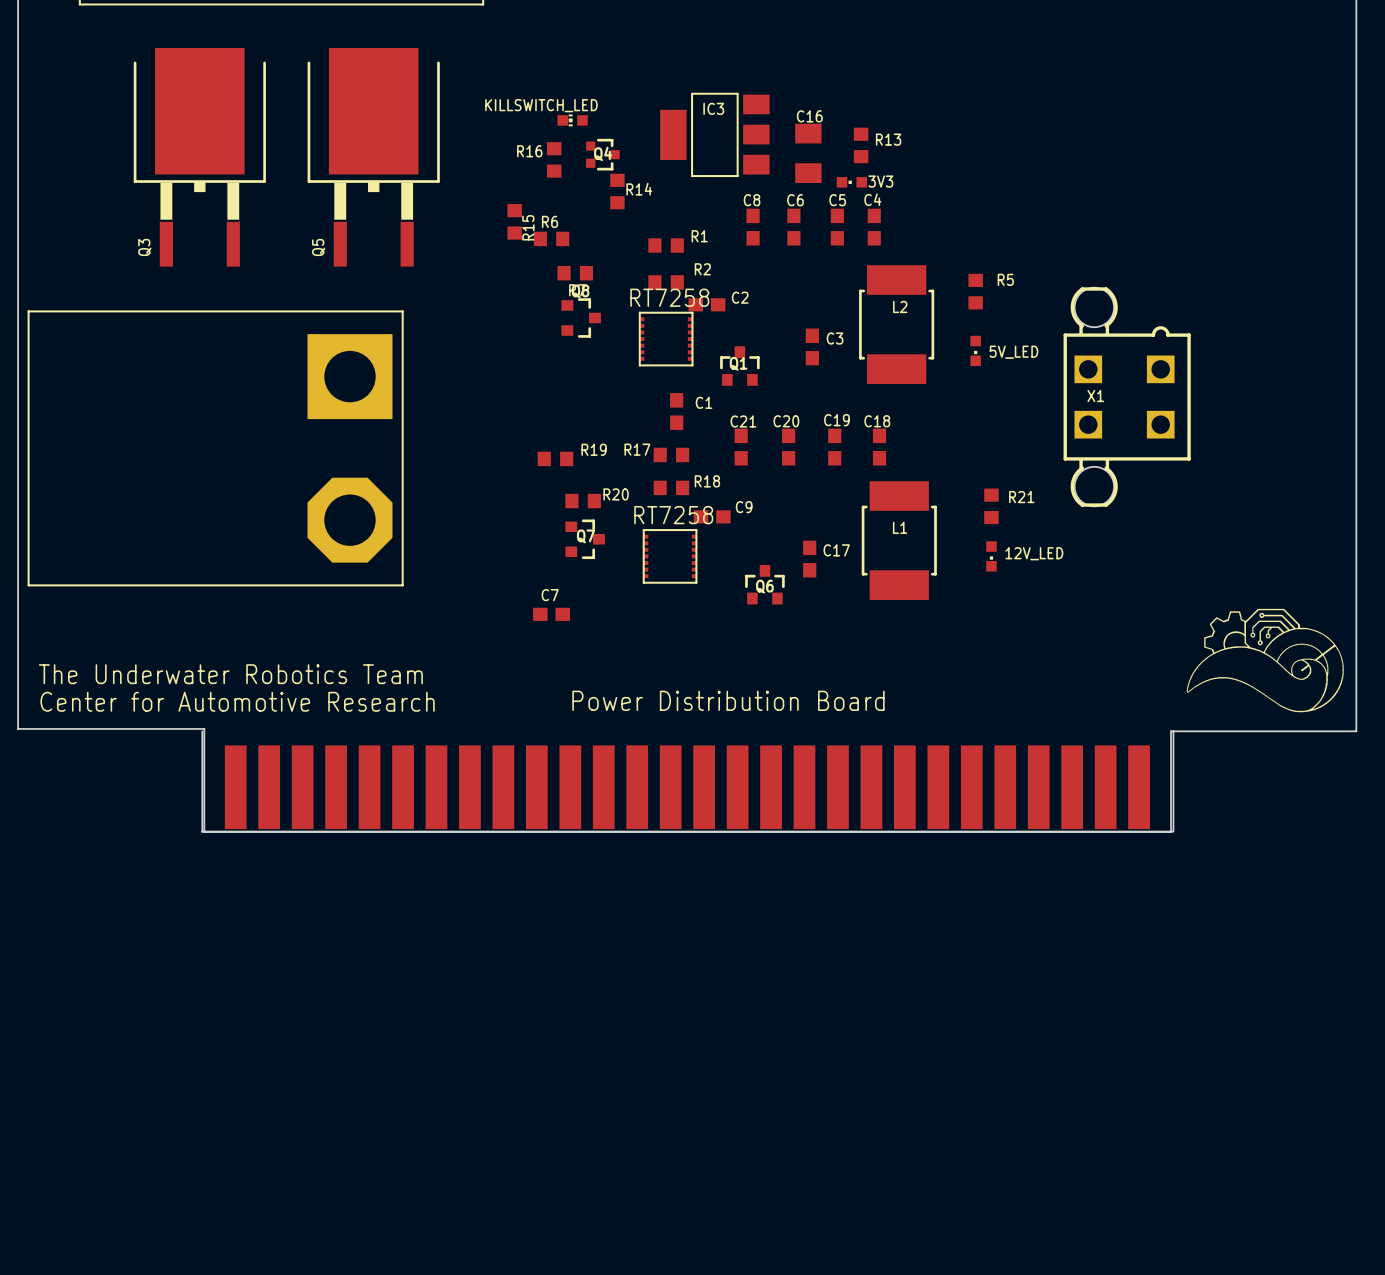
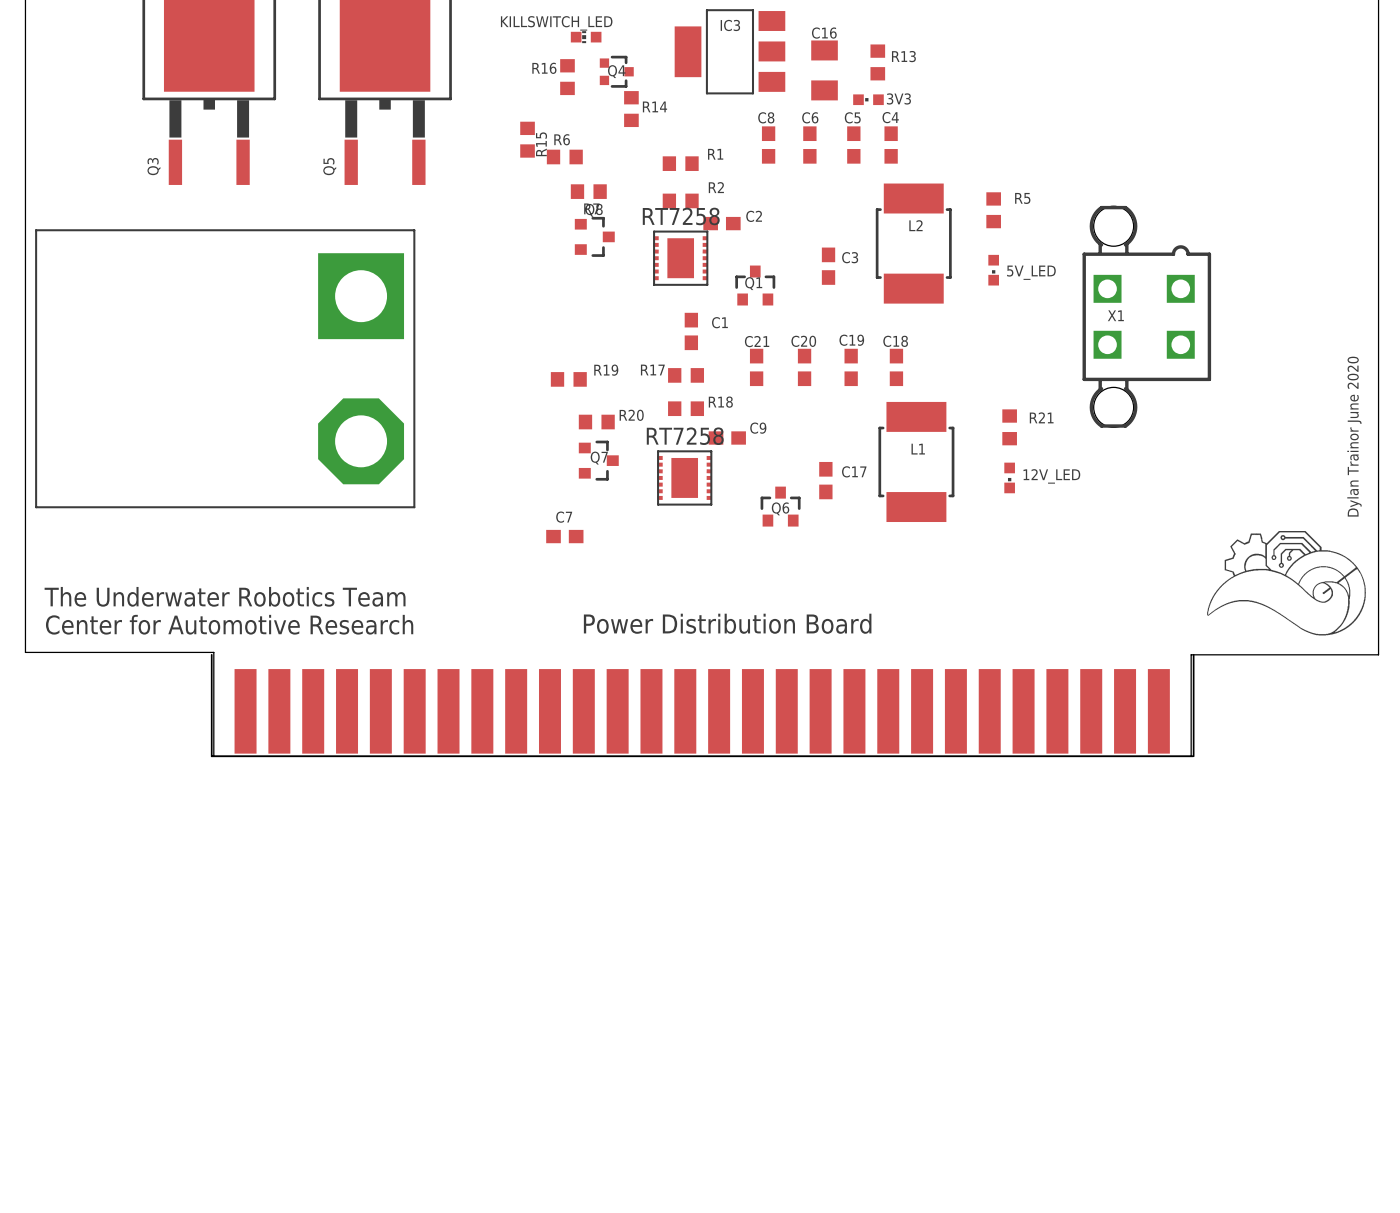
part footprint: [638, 311, 694, 367] -> [653, 230, 709, 286]
text: none -> Dylan Trainor June 2020 (1354, 436)
part footprint: [642, 529, 698, 584] -> [657, 450, 713, 506]

